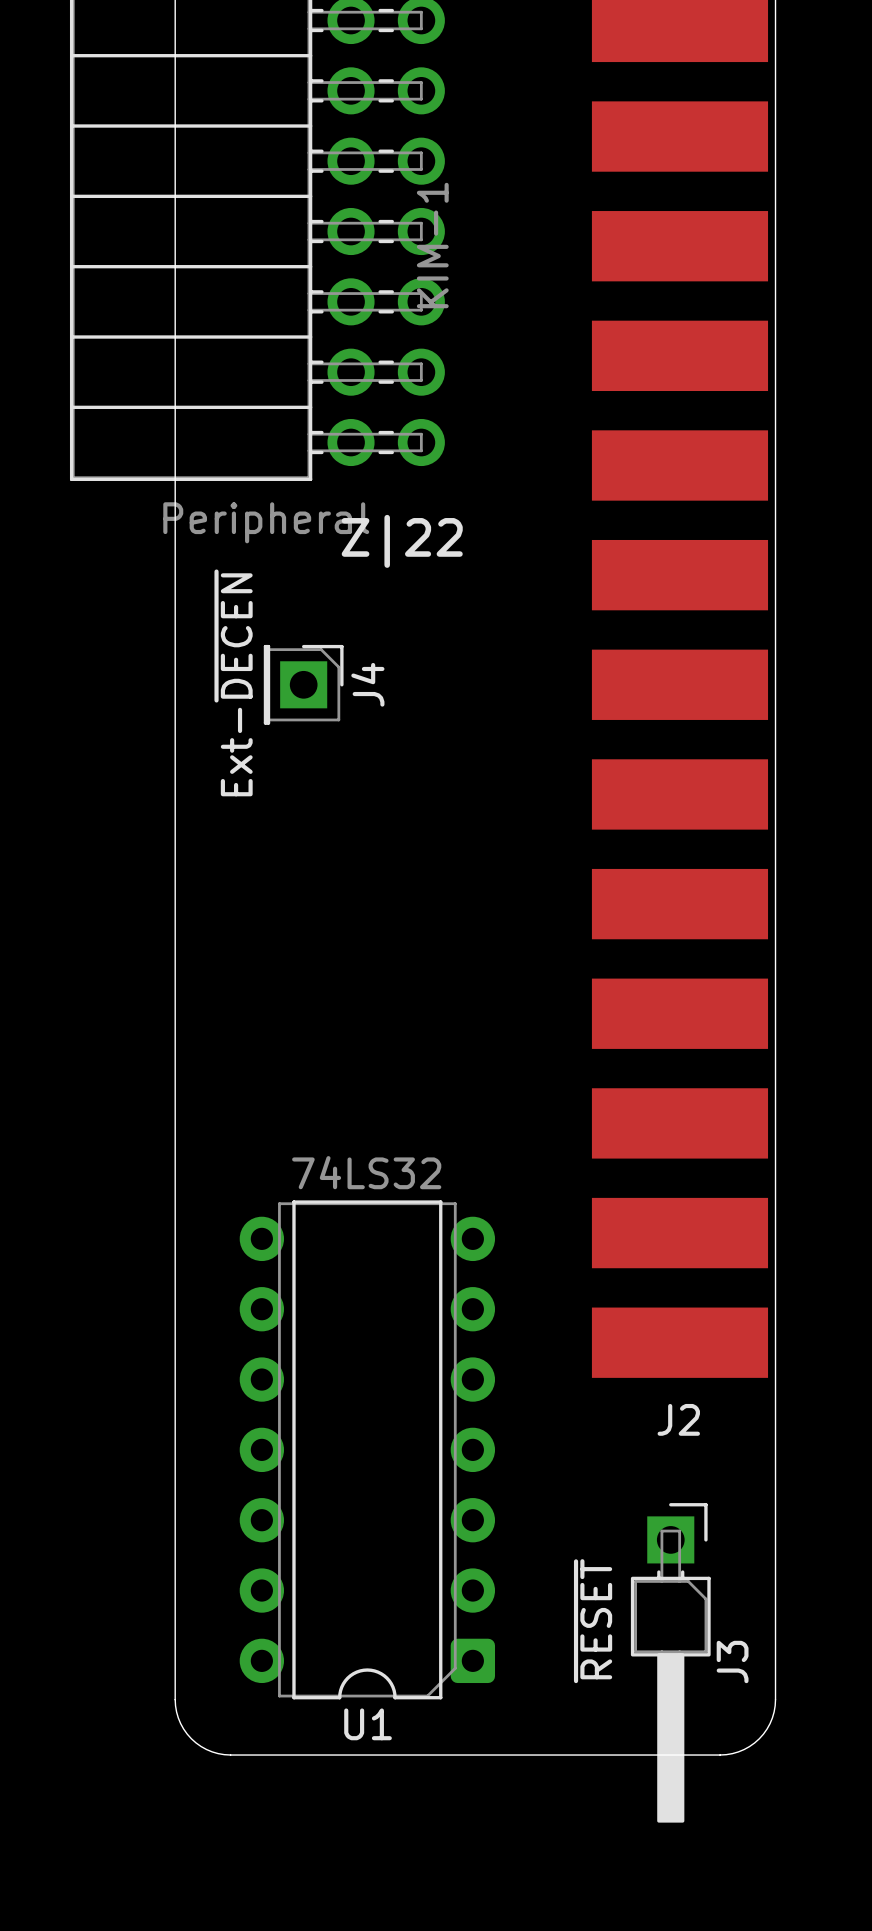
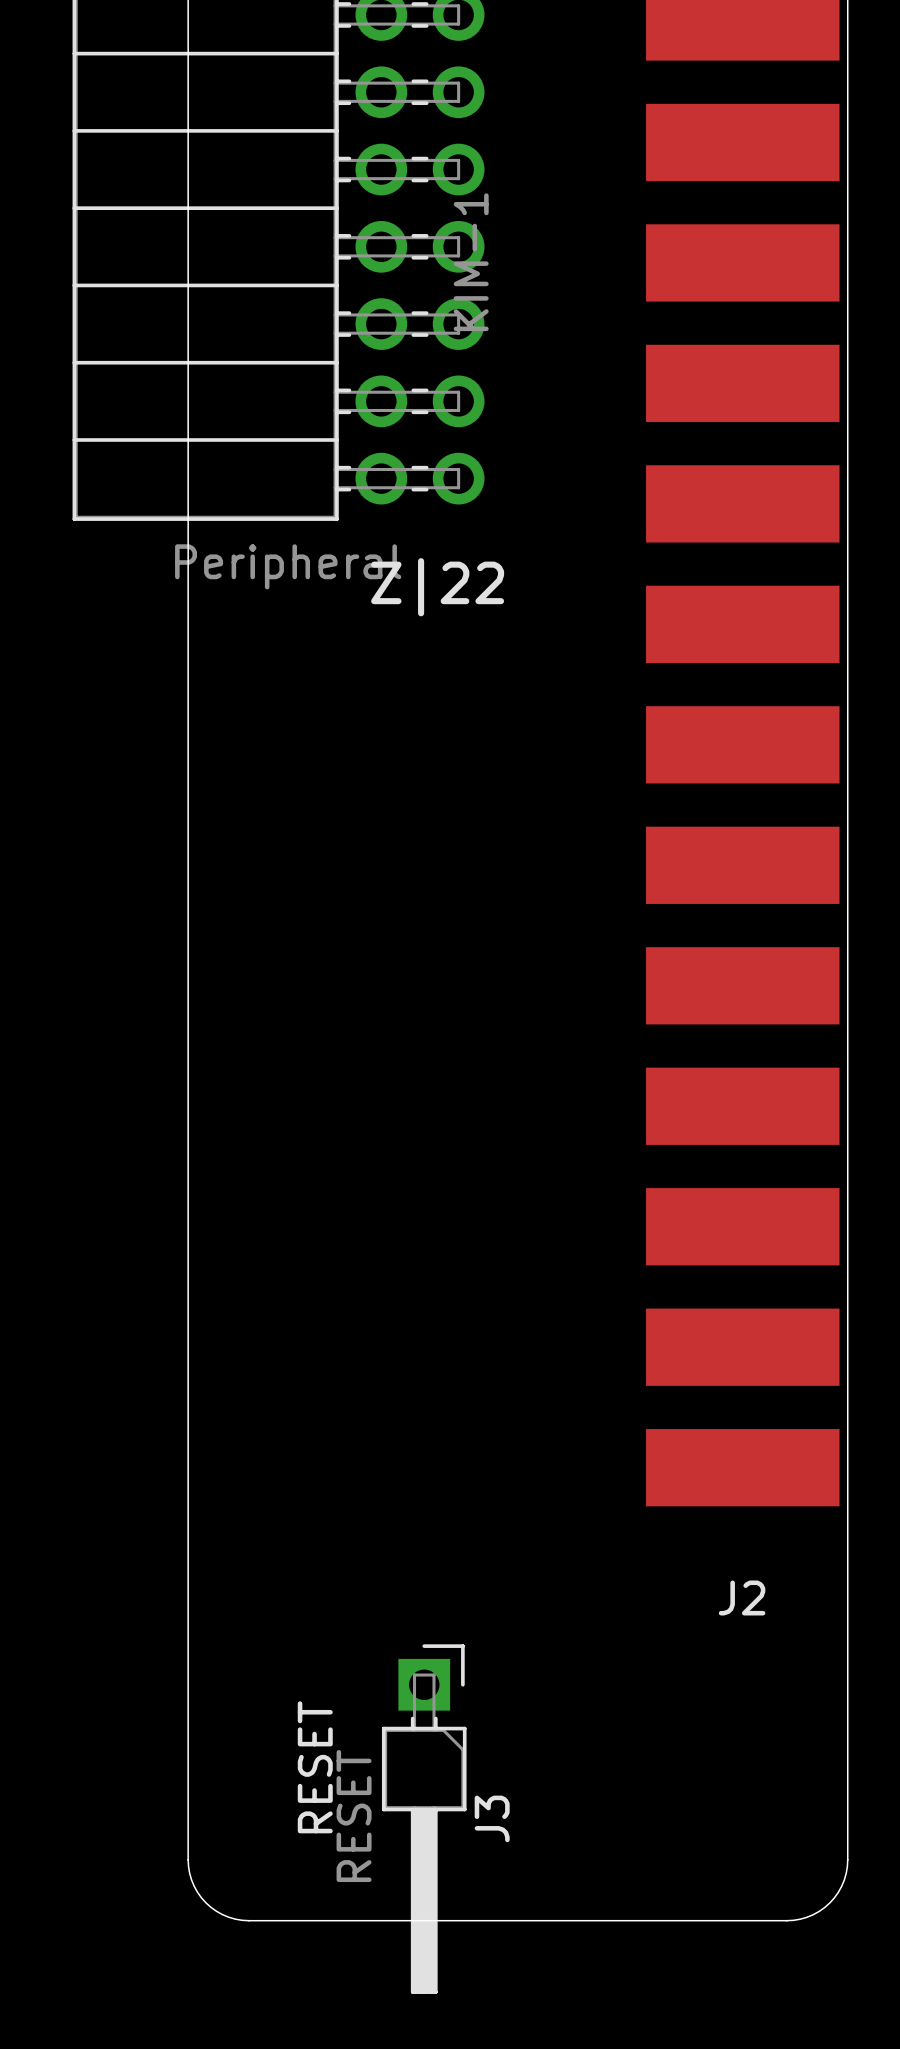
J4: Ext-~{DECEN} (303, 684) -> none
J2 name position: J2 (678, 1419) -> J2 (742, 1597)
U1: 74LS32 (367, 1449) -> none
J3 footprint: [630, 1503, 711, 1823] -> [381, 1644, 467, 1994]
text: none -> RESET (315, 1767)
J3 value: ~{RESET} (593, 1621) -> RESET (354, 1816)

